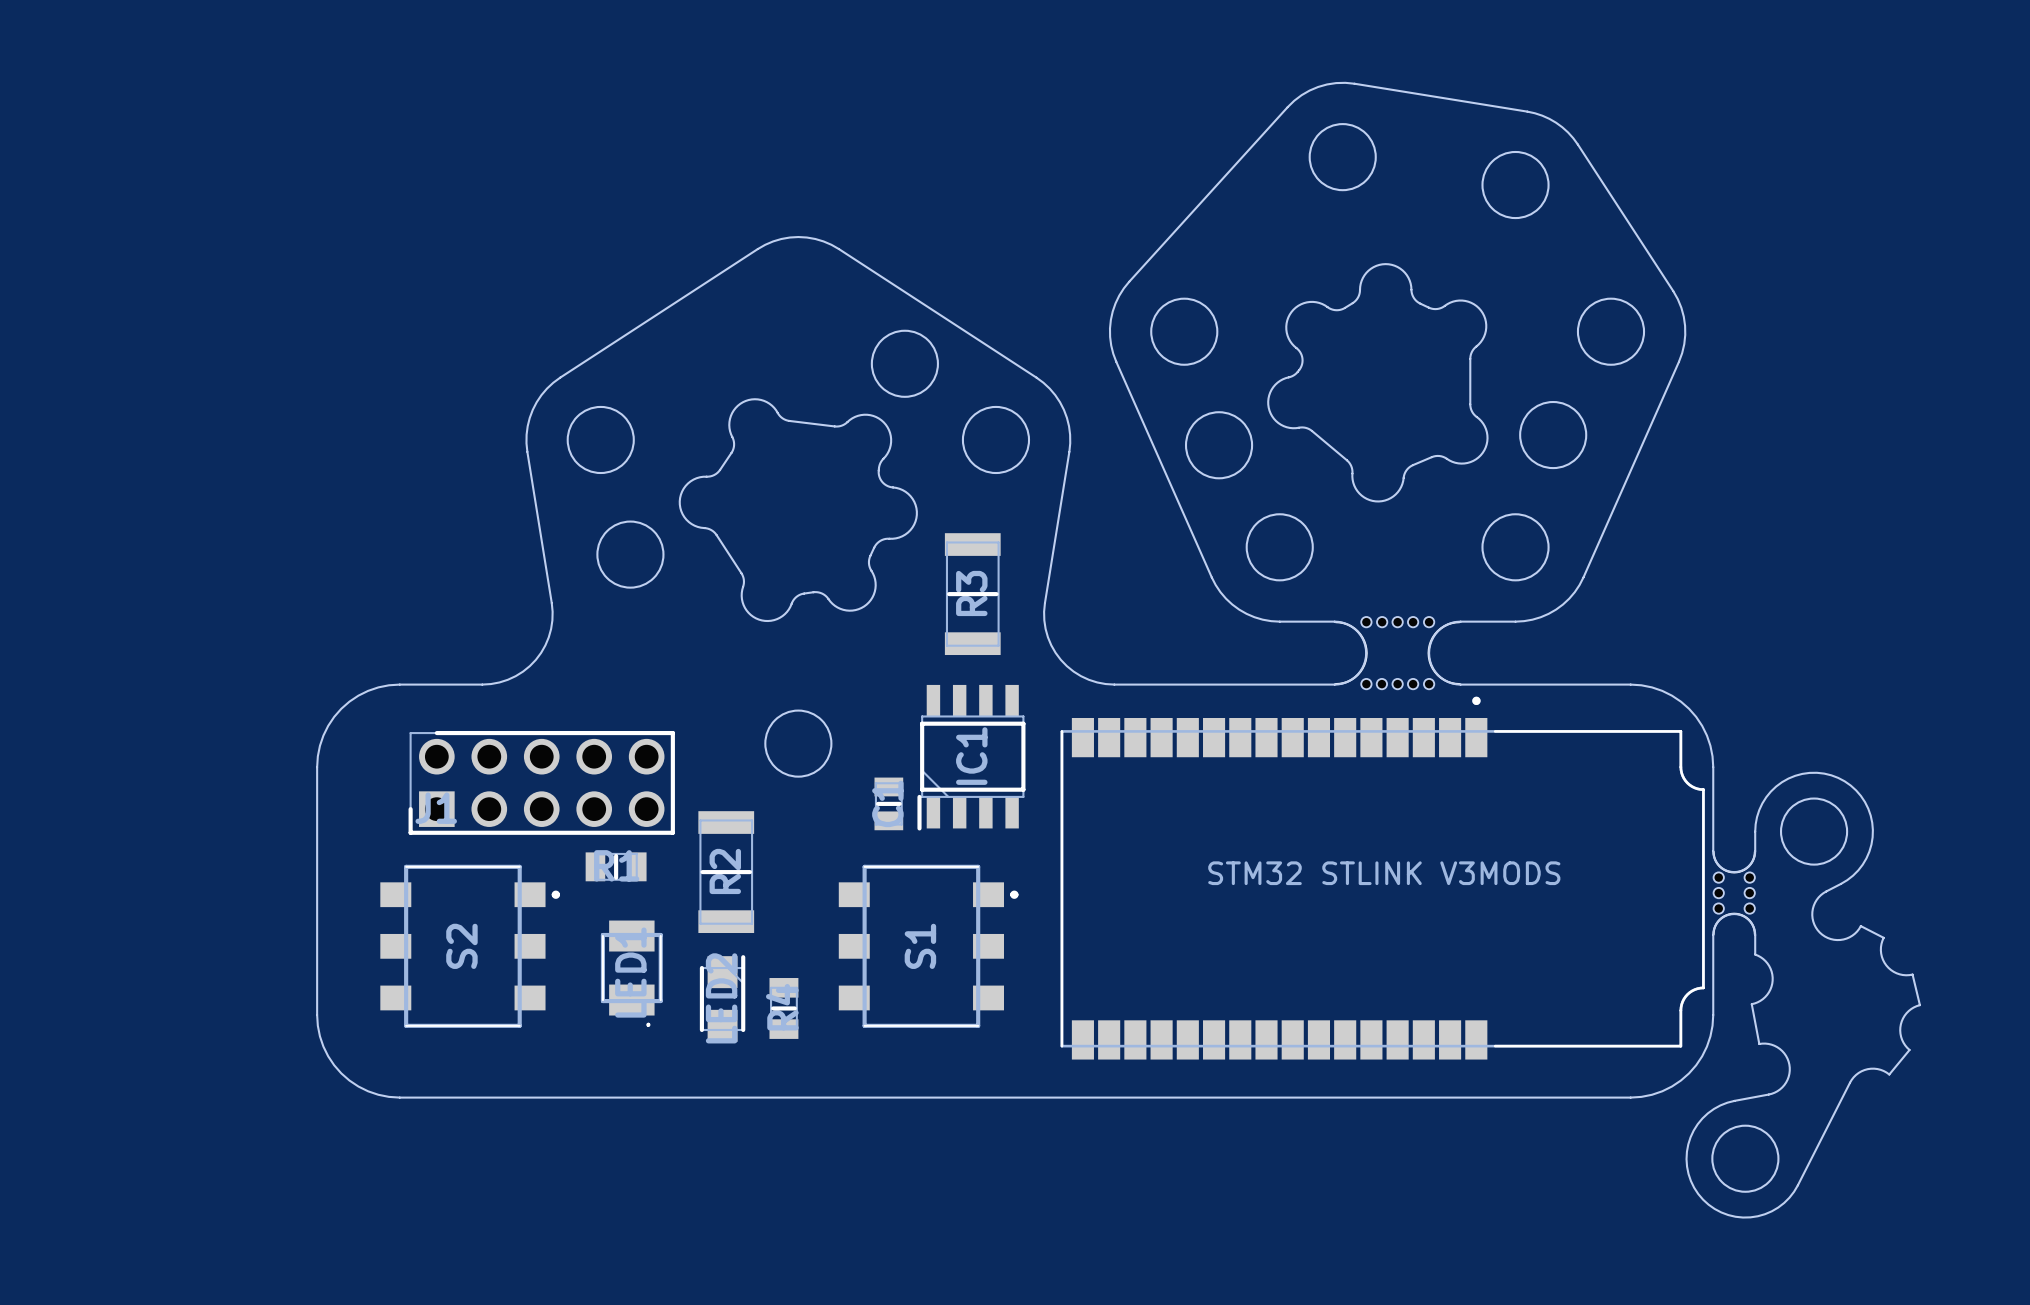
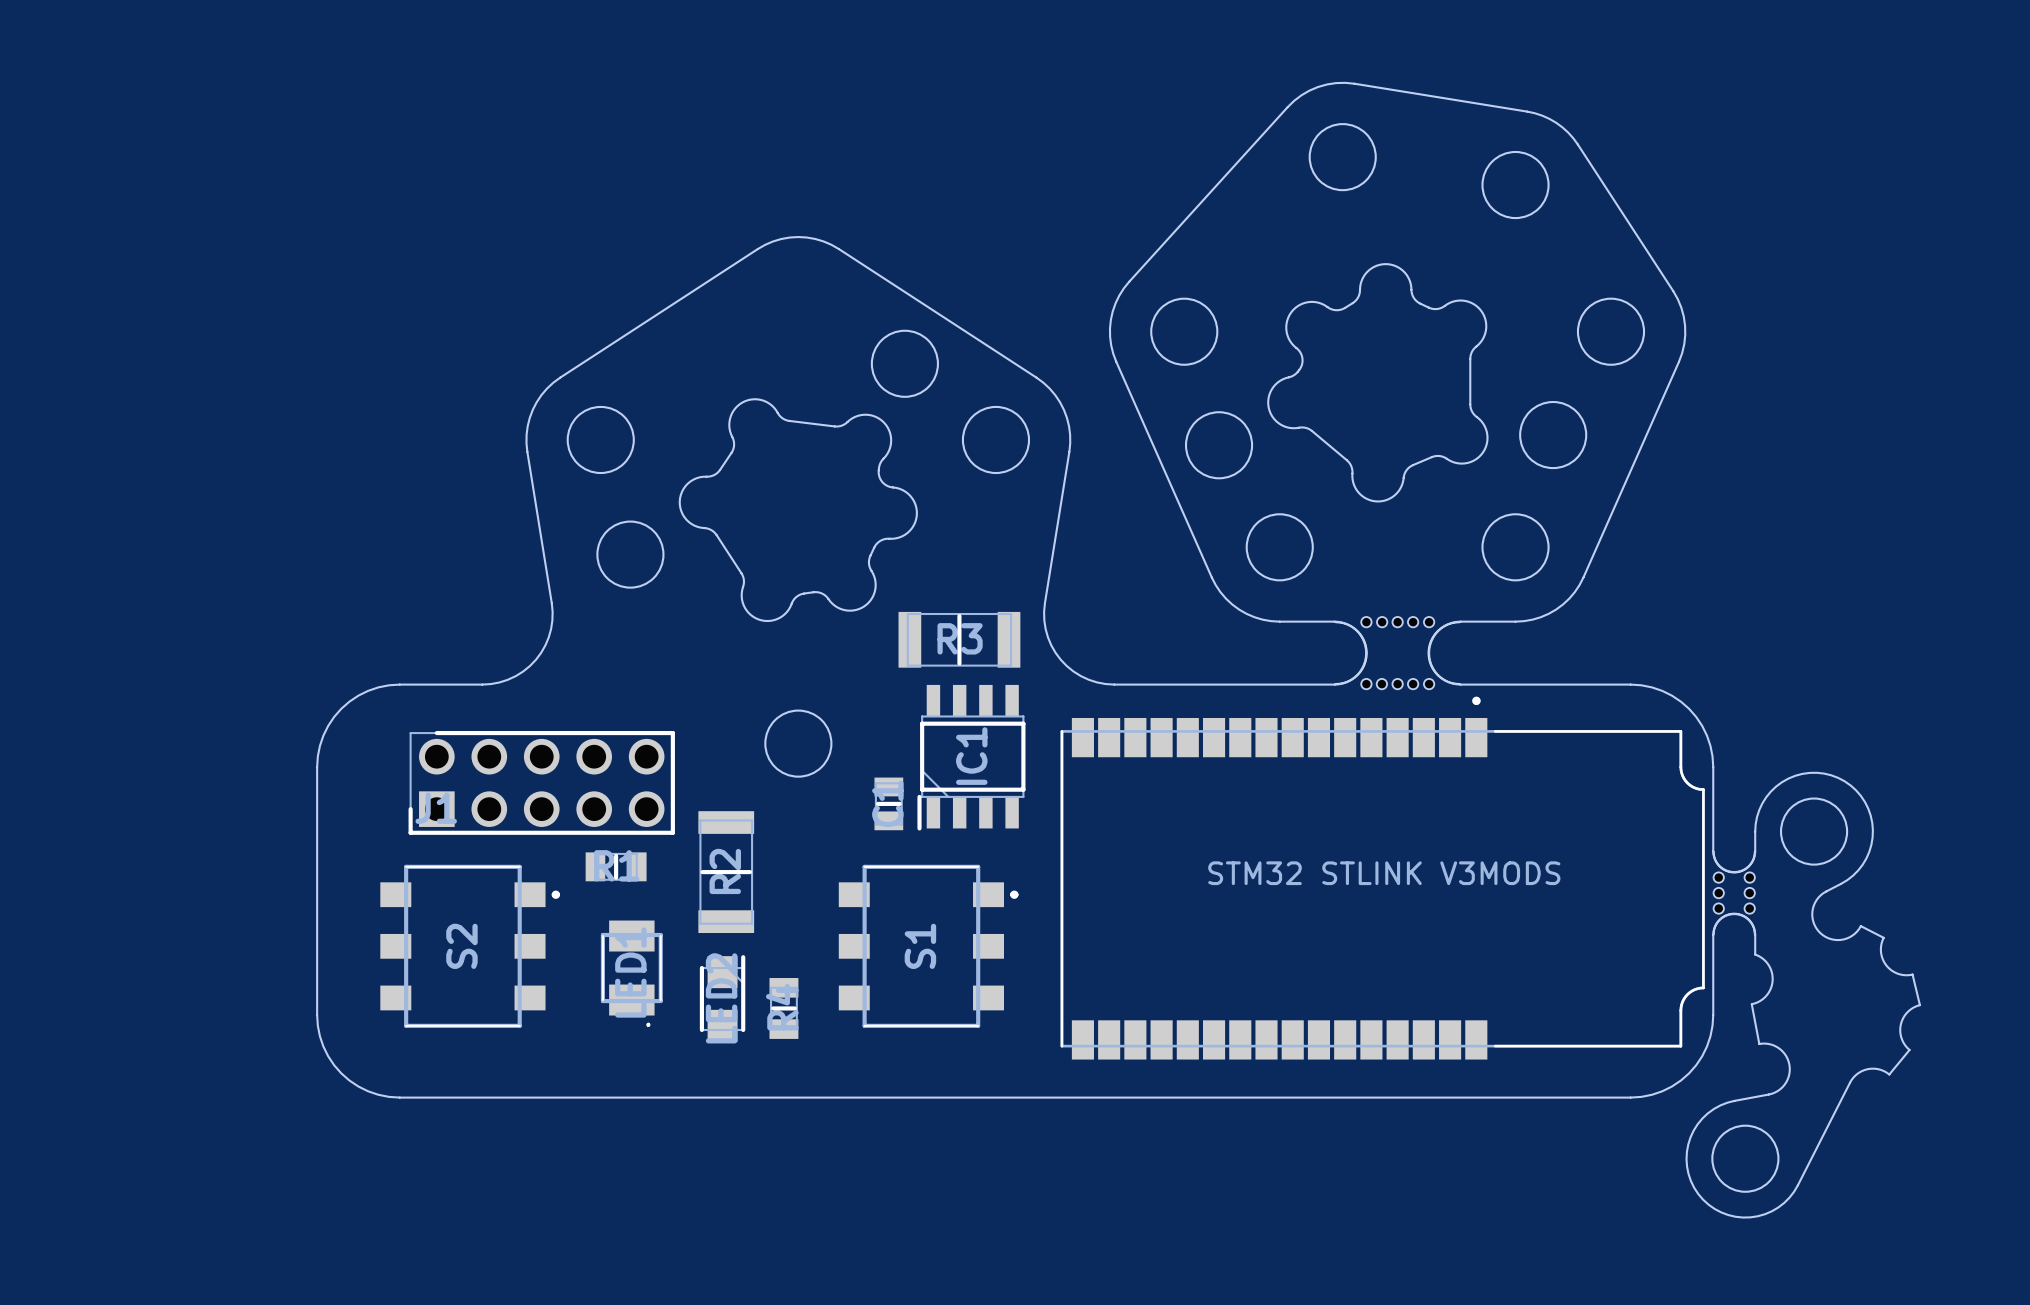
R3 rotation: 0° (972, 594) -> 90° clockwise (959, 639)

